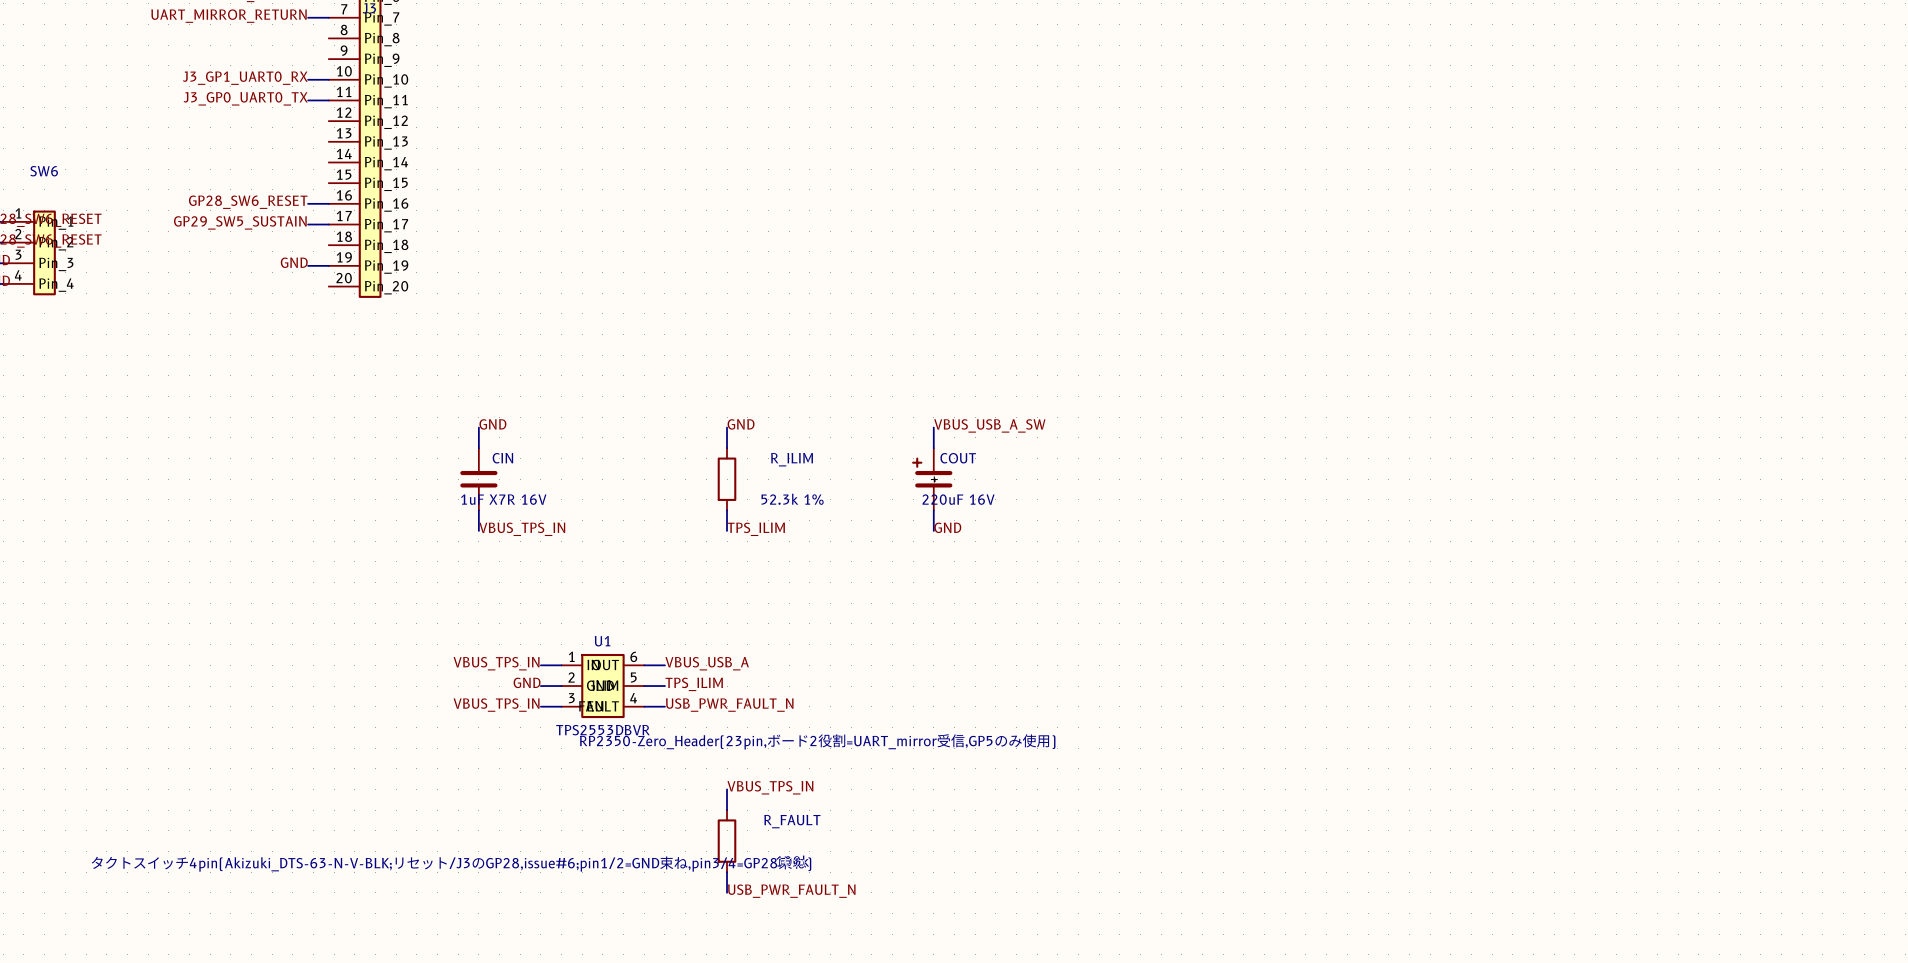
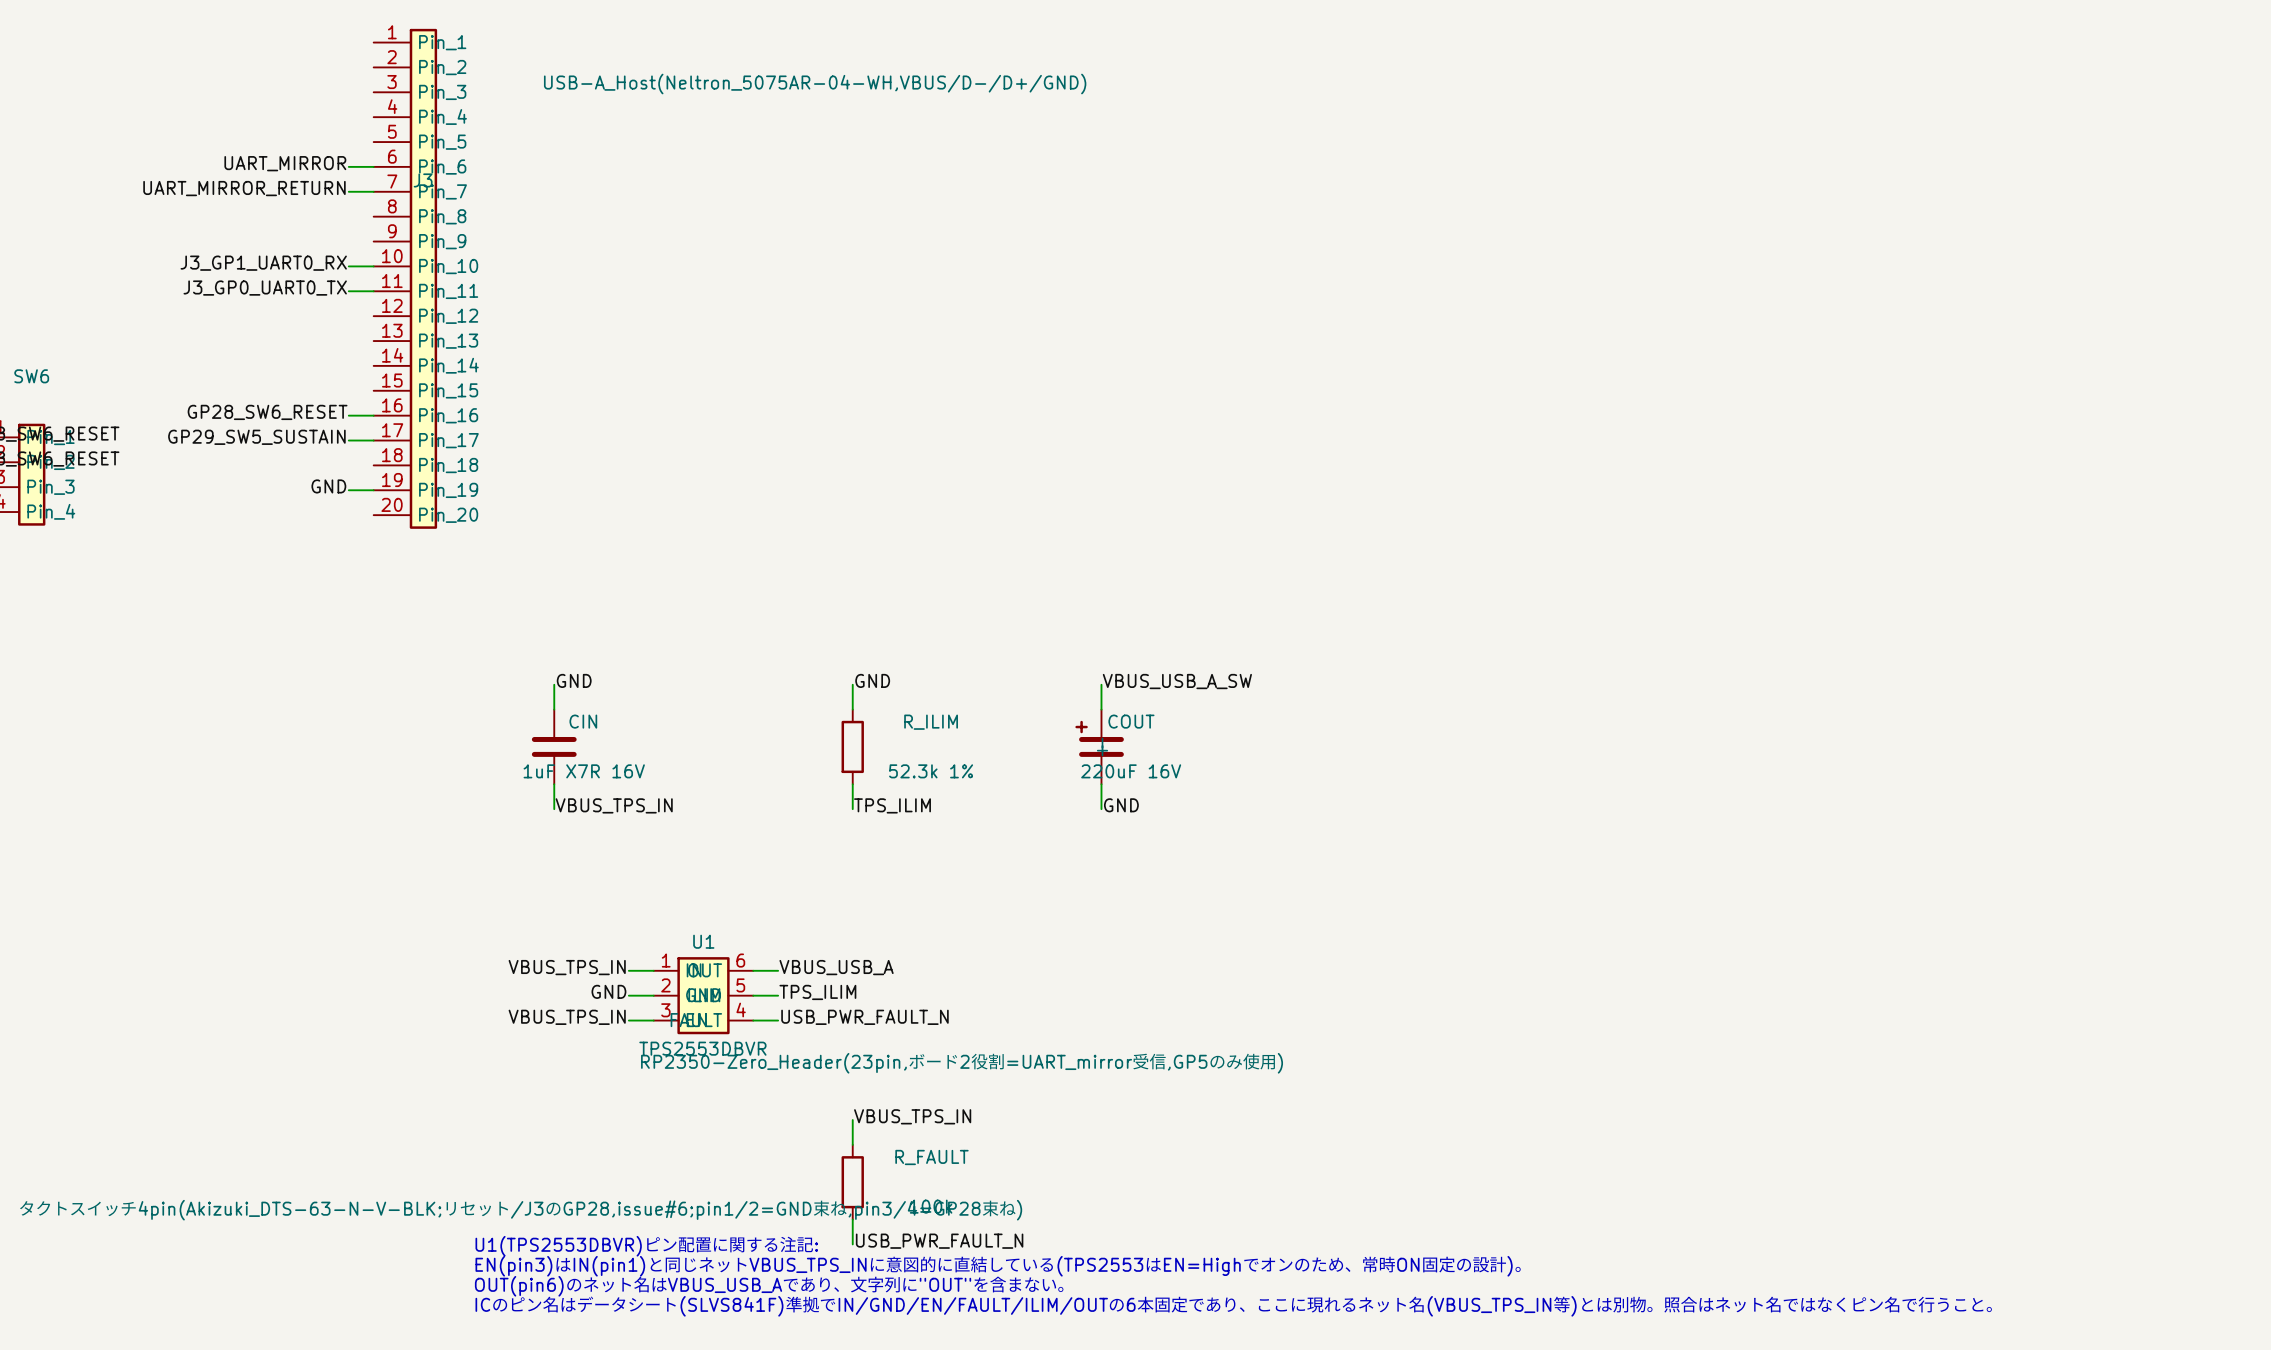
text: none -> U1(TPS2553DBVR)ピン配置に関する注記: (646, 1246)
text: none -> EN(pin3)はIN(pin1)と同じネットVBUS_TPS_INに意図的に直結している(TPS2553はEN=Highでオンのため、常時ON固定の設計)。 (998, 1266)
text: none -> OUT(pin6)のネット名はVBUS_USB_Aであり、文字列に"OUT"を含まない。 (769, 1286)
text: none -> ICのピン名はデータシート(SLVS841F)準拠でIN/GND/EN/FAULT/ILIM/OUTの6本固定であり、ここに現れるネット名(VBUS_TPS_IN等)とは別物。照合はネット名ではなくピン名で行うこと。 (1234, 1306)

